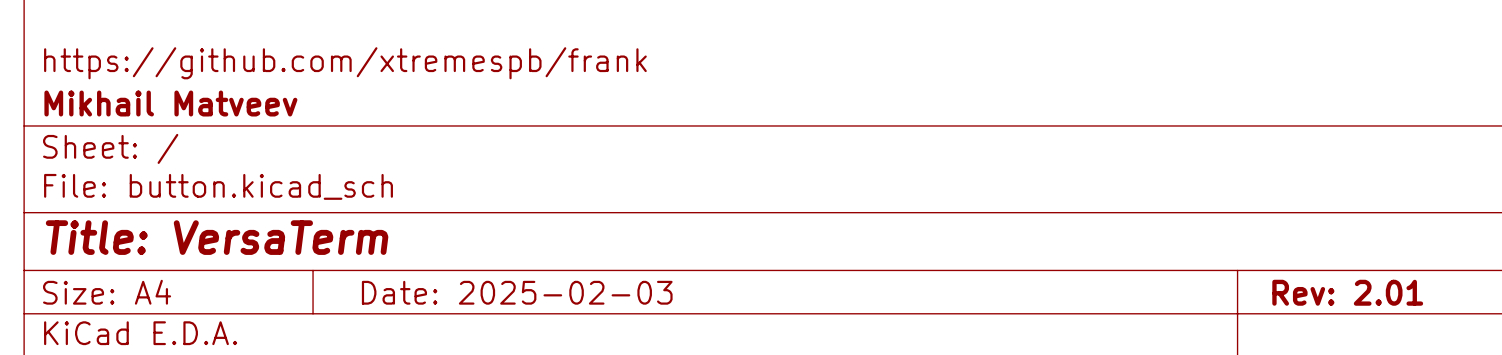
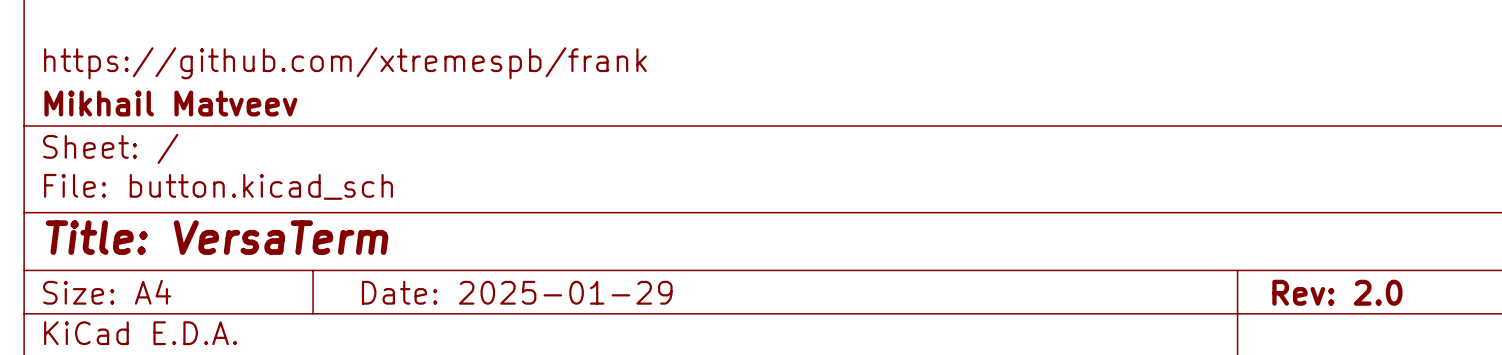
title block: Date: 2025-02-03 (517, 292) -> Date: 2025-01-29 (517, 292)
title block: Rev: 2.01 (1347, 292) -> Rev: 2.0 (1337, 292)

